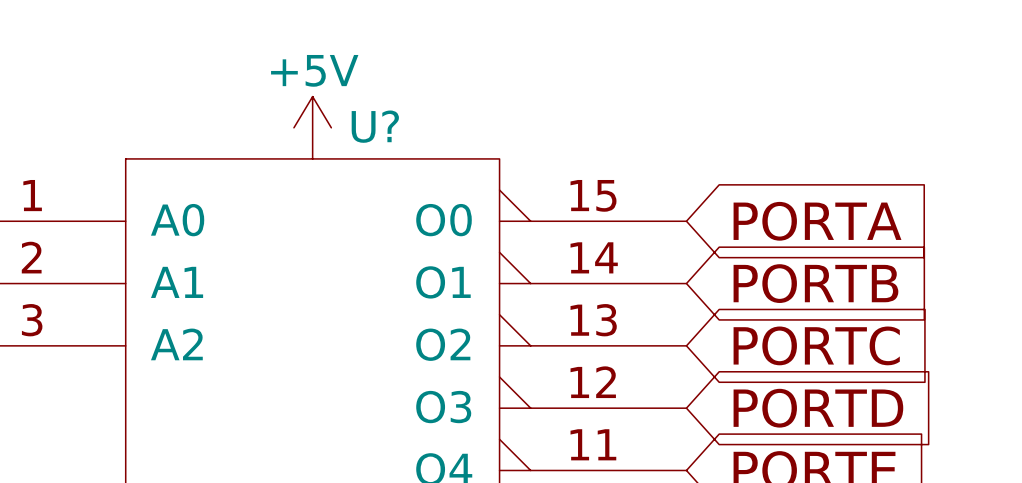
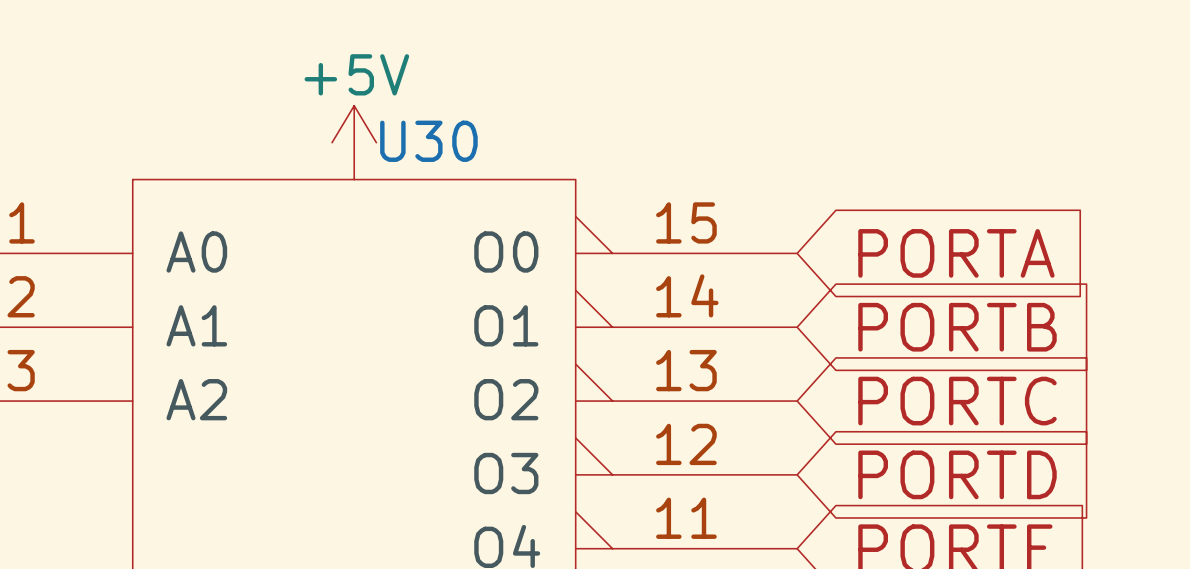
U? name: U? (375, 126) -> U30 (428, 141)

